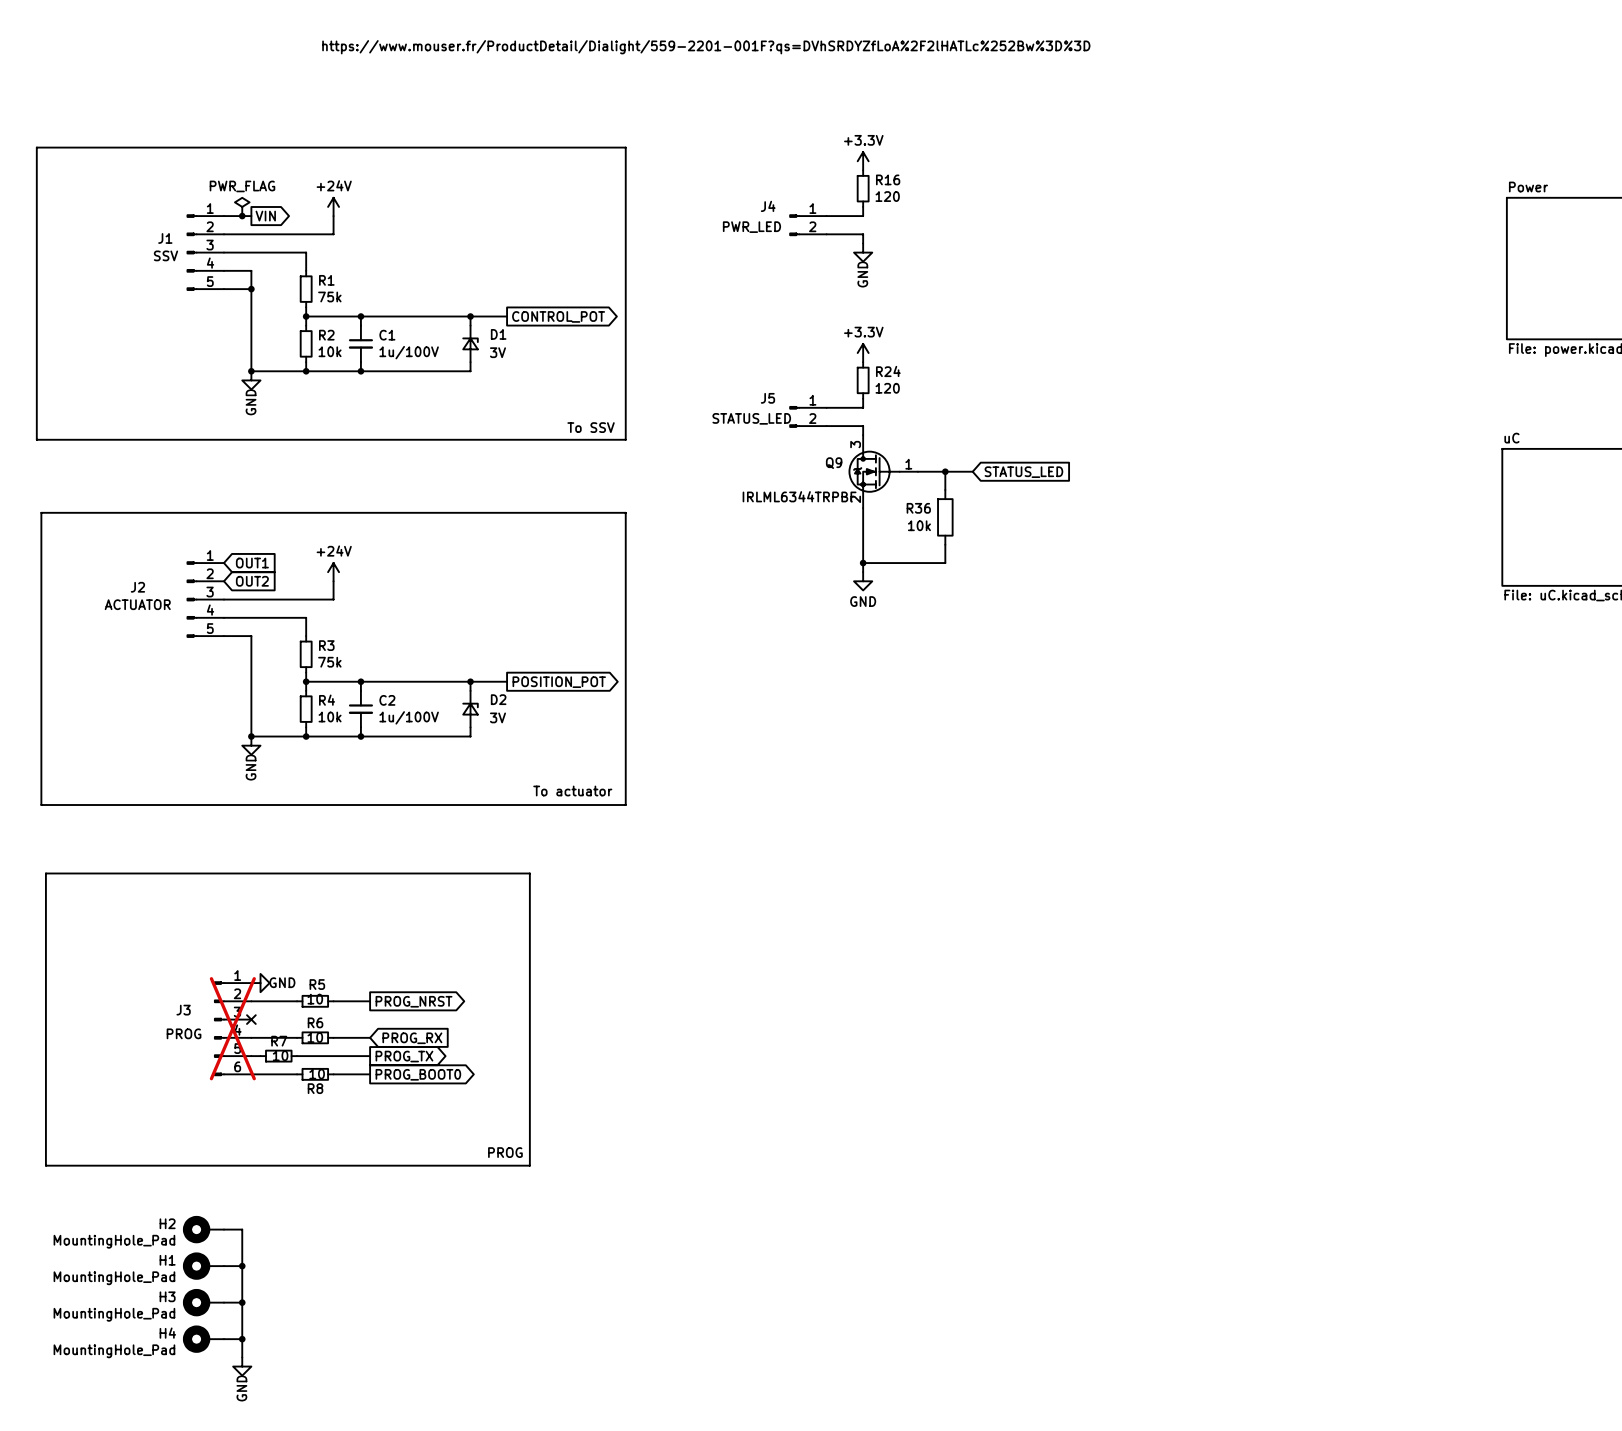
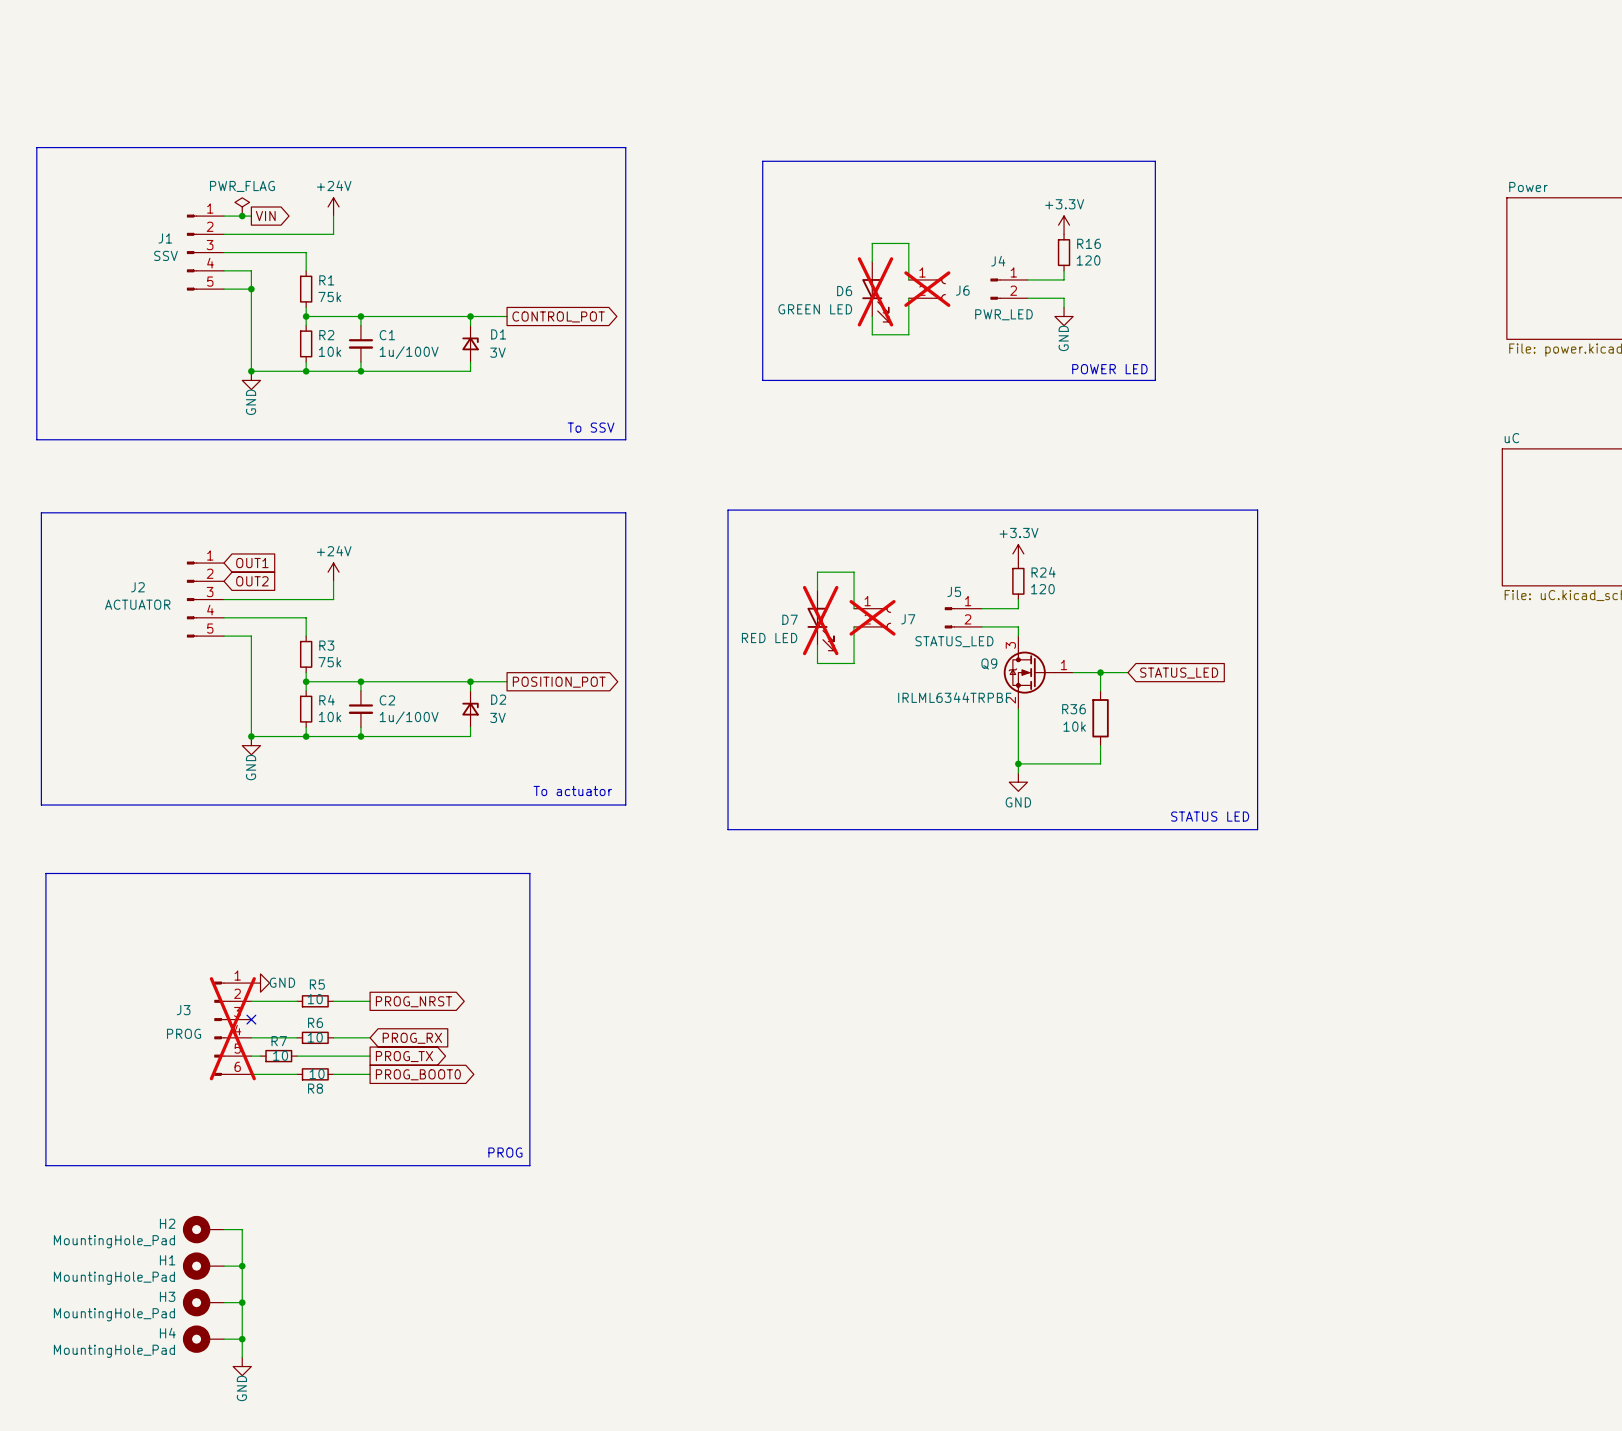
text: https://www.mouser.fr/ProductDetail/Dialight/559-2201-001F?qs=DVhSRDYZfLoA%2F2lHATLc%252Bw%3D%3D (706, 47) -> none
line: none -> (762, 161) (1155, 161) (1155, 380) (762, 380) (762, 161)
power symbol: +3.3V (863, 161) -> none
R16 position: (863, 188) -> (1064, 252)
J4 name position: J4 (768, 206) -> J4 (998, 261)
wire: (863, 206) (863, 216) (826, 216) -> none
J4 position: (808, 225) -> (1008, 289)
power symbol: none -> +3.3V (1064, 225)
J4 value position: PWR_LED (751, 227) -> PWR_LED (1003, 314)
wire: (826, 234) (863, 234) (863, 243) -> none
power symbol: GND (863, 252) -> none
wire: none -> (872, 261) (872, 243) (908, 243) (908, 279)
wire: none -> (1064, 270) (1064, 279) (1027, 279)
J6: none -> (927, 289)
D6: none -> GREEN LED (875, 291)
wire: none -> (908, 298) (908, 334) (872, 334) (872, 316)
wire: none -> (1027, 298) (1064, 298) (1064, 307)
power symbol: none -> GND (1064, 316)
power symbol: +3.3V (863, 353) -> none
text: none -> POWER LED (1109, 369)
R24 position: (863, 380) -> (1018, 581)
J5 name position: J5 (767, 398) -> J5 (954, 591)
wire: (863, 398) (863, 407) (826, 407) -> none
J5 position: (808, 416) -> (963, 617)
J5 value position: STATUS_LED (751, 418) -> STATUS_LED (954, 641)
wire: (826, 426) (863, 426) (863, 435) -> none
Q9 position: (883, 471) -> (1038, 672)
wire: (917, 471) (972, 471) -> none
wire: (945, 471) (945, 489) -> none
junction: (945, 471) -> none
global label: STATUS_LED (1023, 472) -> none
wire: (863, 508) (863, 572) -> none
line: none -> (728, 510) (1257, 510) (1257, 829) (728, 829) (728, 510)
R36 position: (945, 517) -> (1100, 718)
wire: (945, 544) (945, 563) (863, 563) -> none
power symbol: none -> +3.3V (1018, 553)
junction: (863, 563) -> none
power symbol: GND (863, 581) -> none
wire: none -> (817, 590) (817, 572) (854, 572) (854, 608)
wire: none -> (1018, 599) (1018, 608) (981, 608)
J7: none -> (872, 617)
D7: none -> RED LED (820, 620)
wire: none -> (854, 626) (854, 663) (817, 663) (817, 645)
wire: none -> (981, 626) (1018, 626) (1018, 636)
wire: none -> (1073, 672) (1127, 672)
wire: none -> (1100, 672) (1100, 690)
junction: none -> (1100, 672)
global label: none -> STATUS_LED (1179, 673)
wire: none -> (1018, 709) (1018, 773)
wire: none -> (1100, 745) (1100, 763) (1018, 763)
junction: none -> (1018, 763)
power symbol: none -> GND (1018, 782)
text: none -> STATUS LED (1210, 816)

